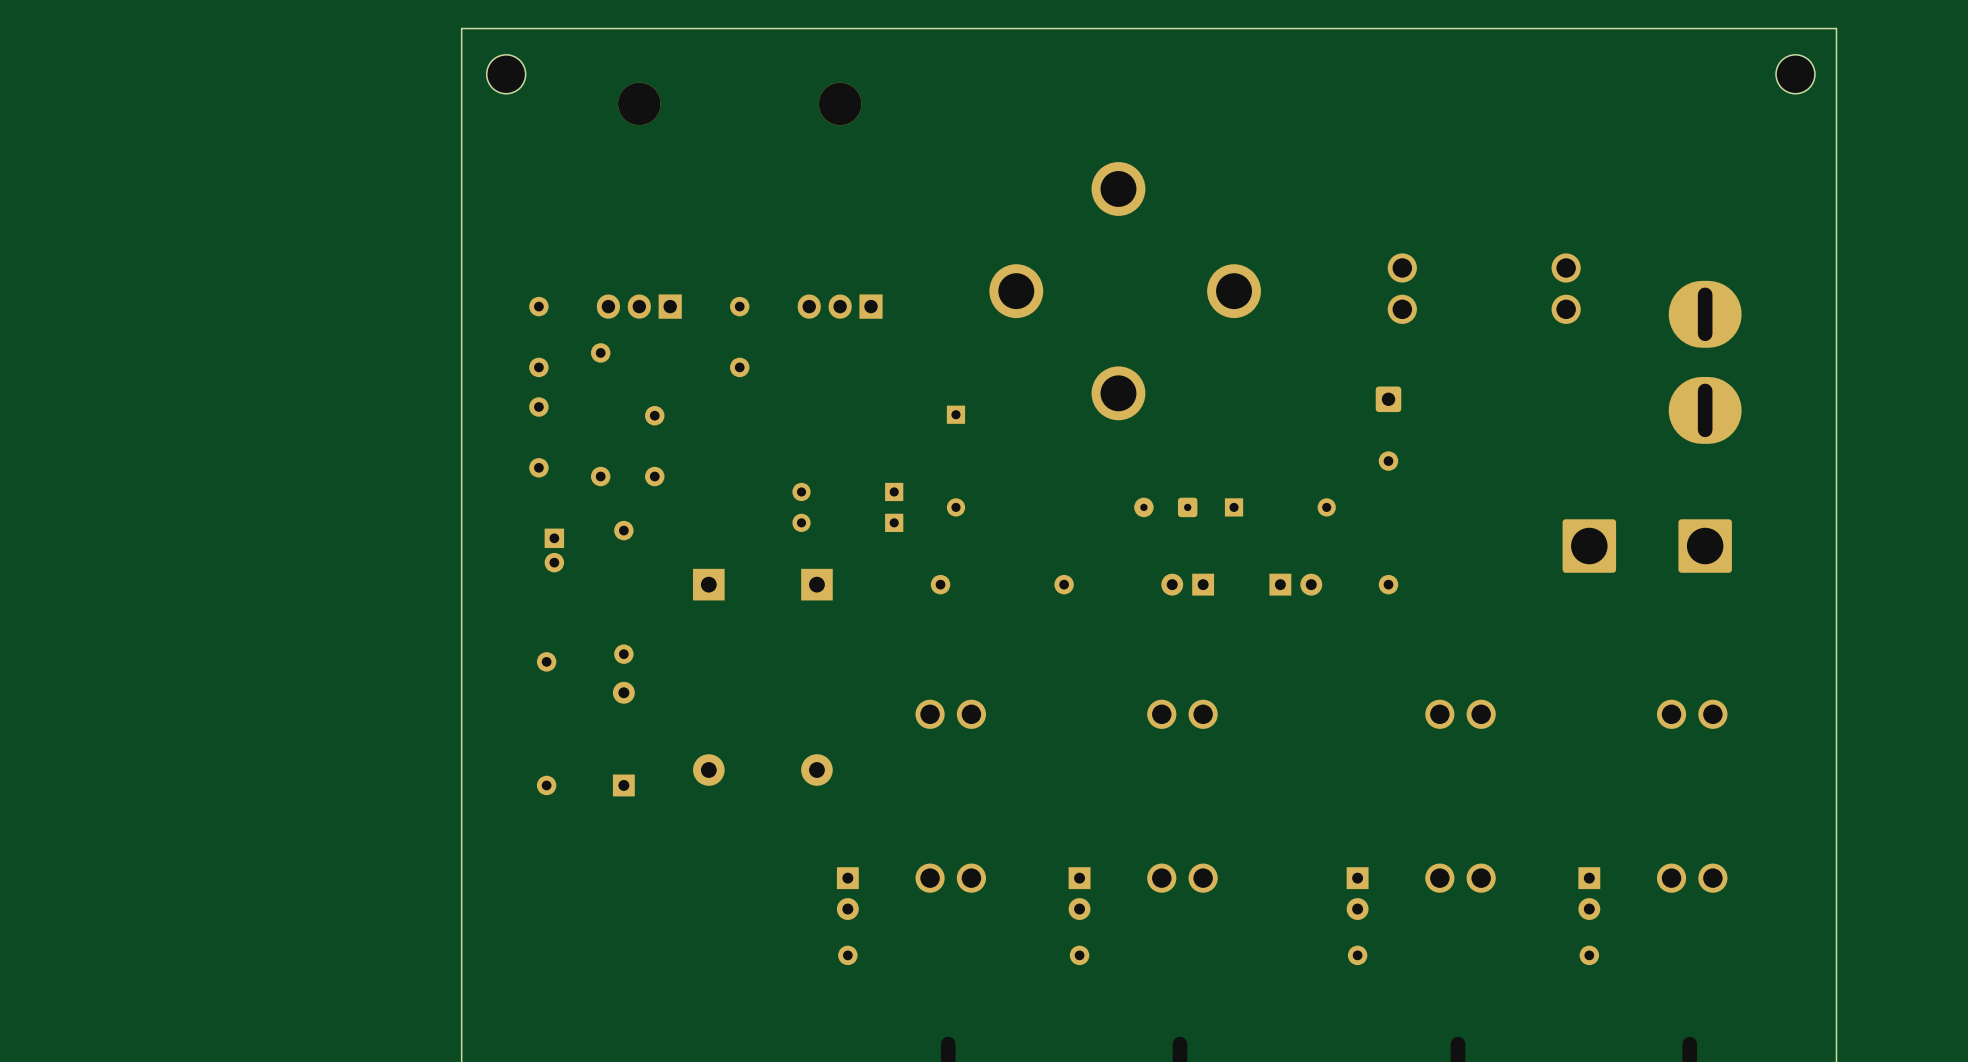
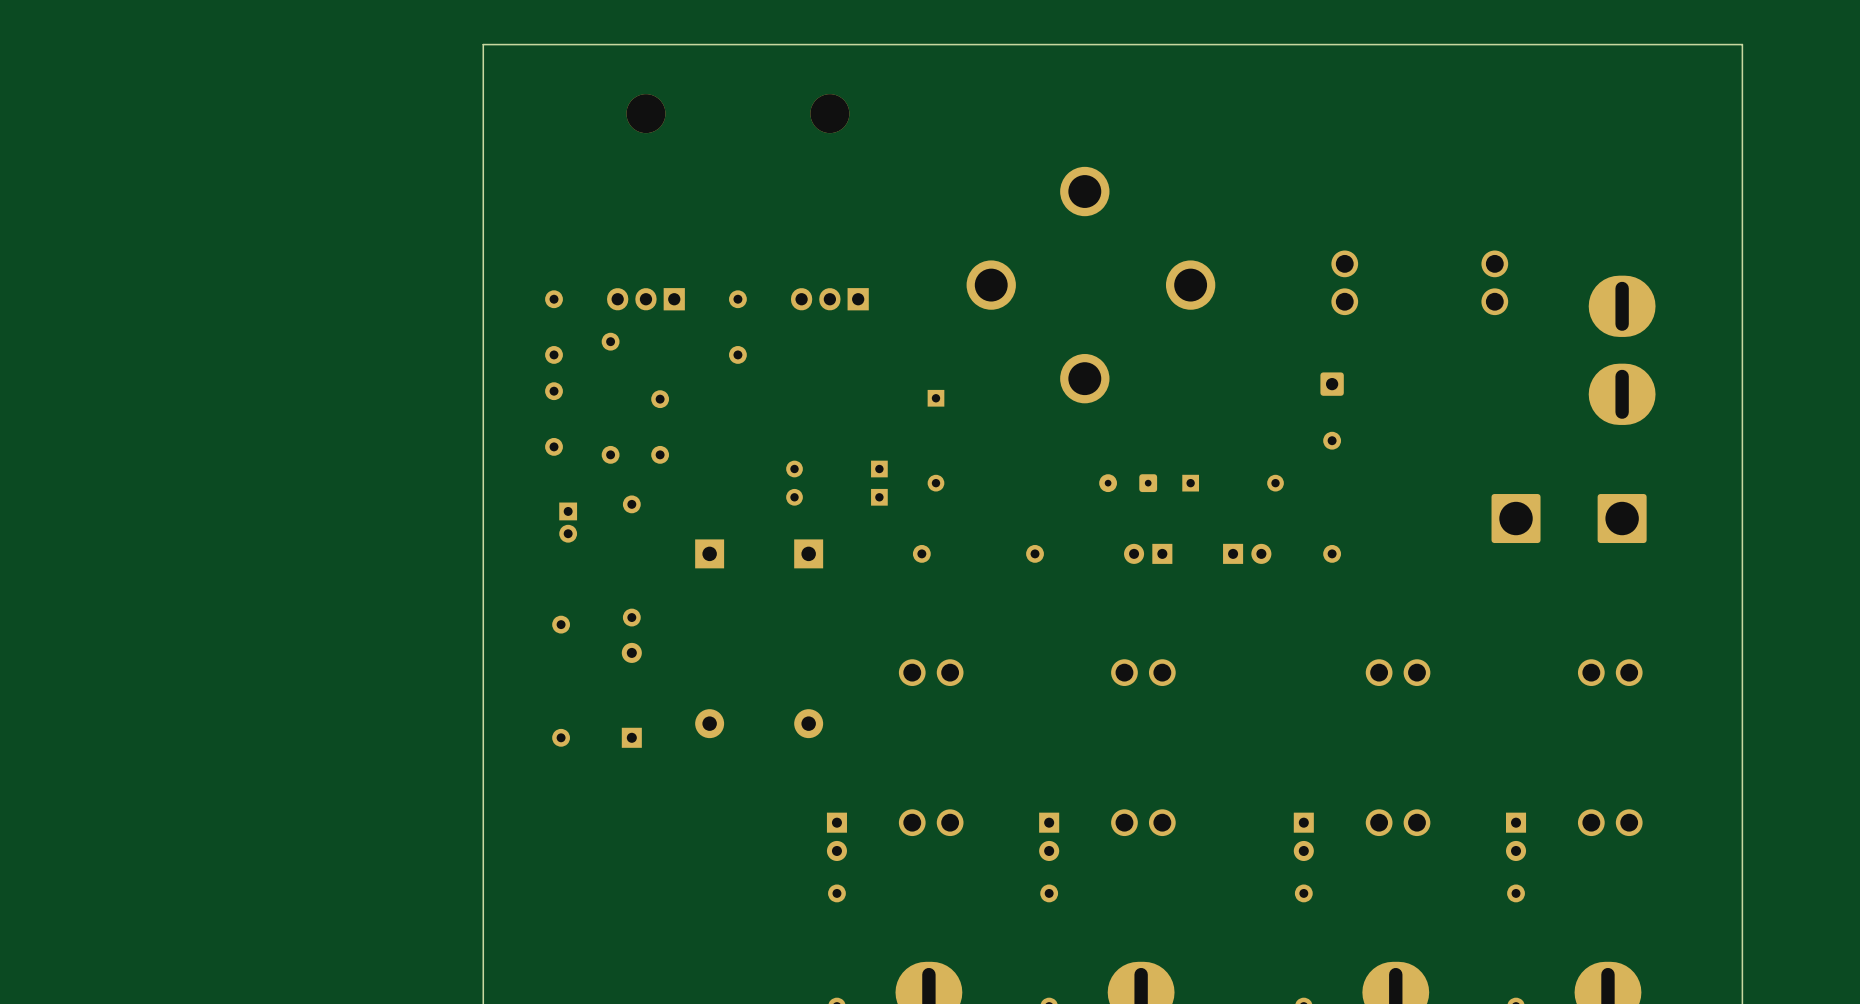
part: (506, 74) -> none
part: (1795, 74) -> none

